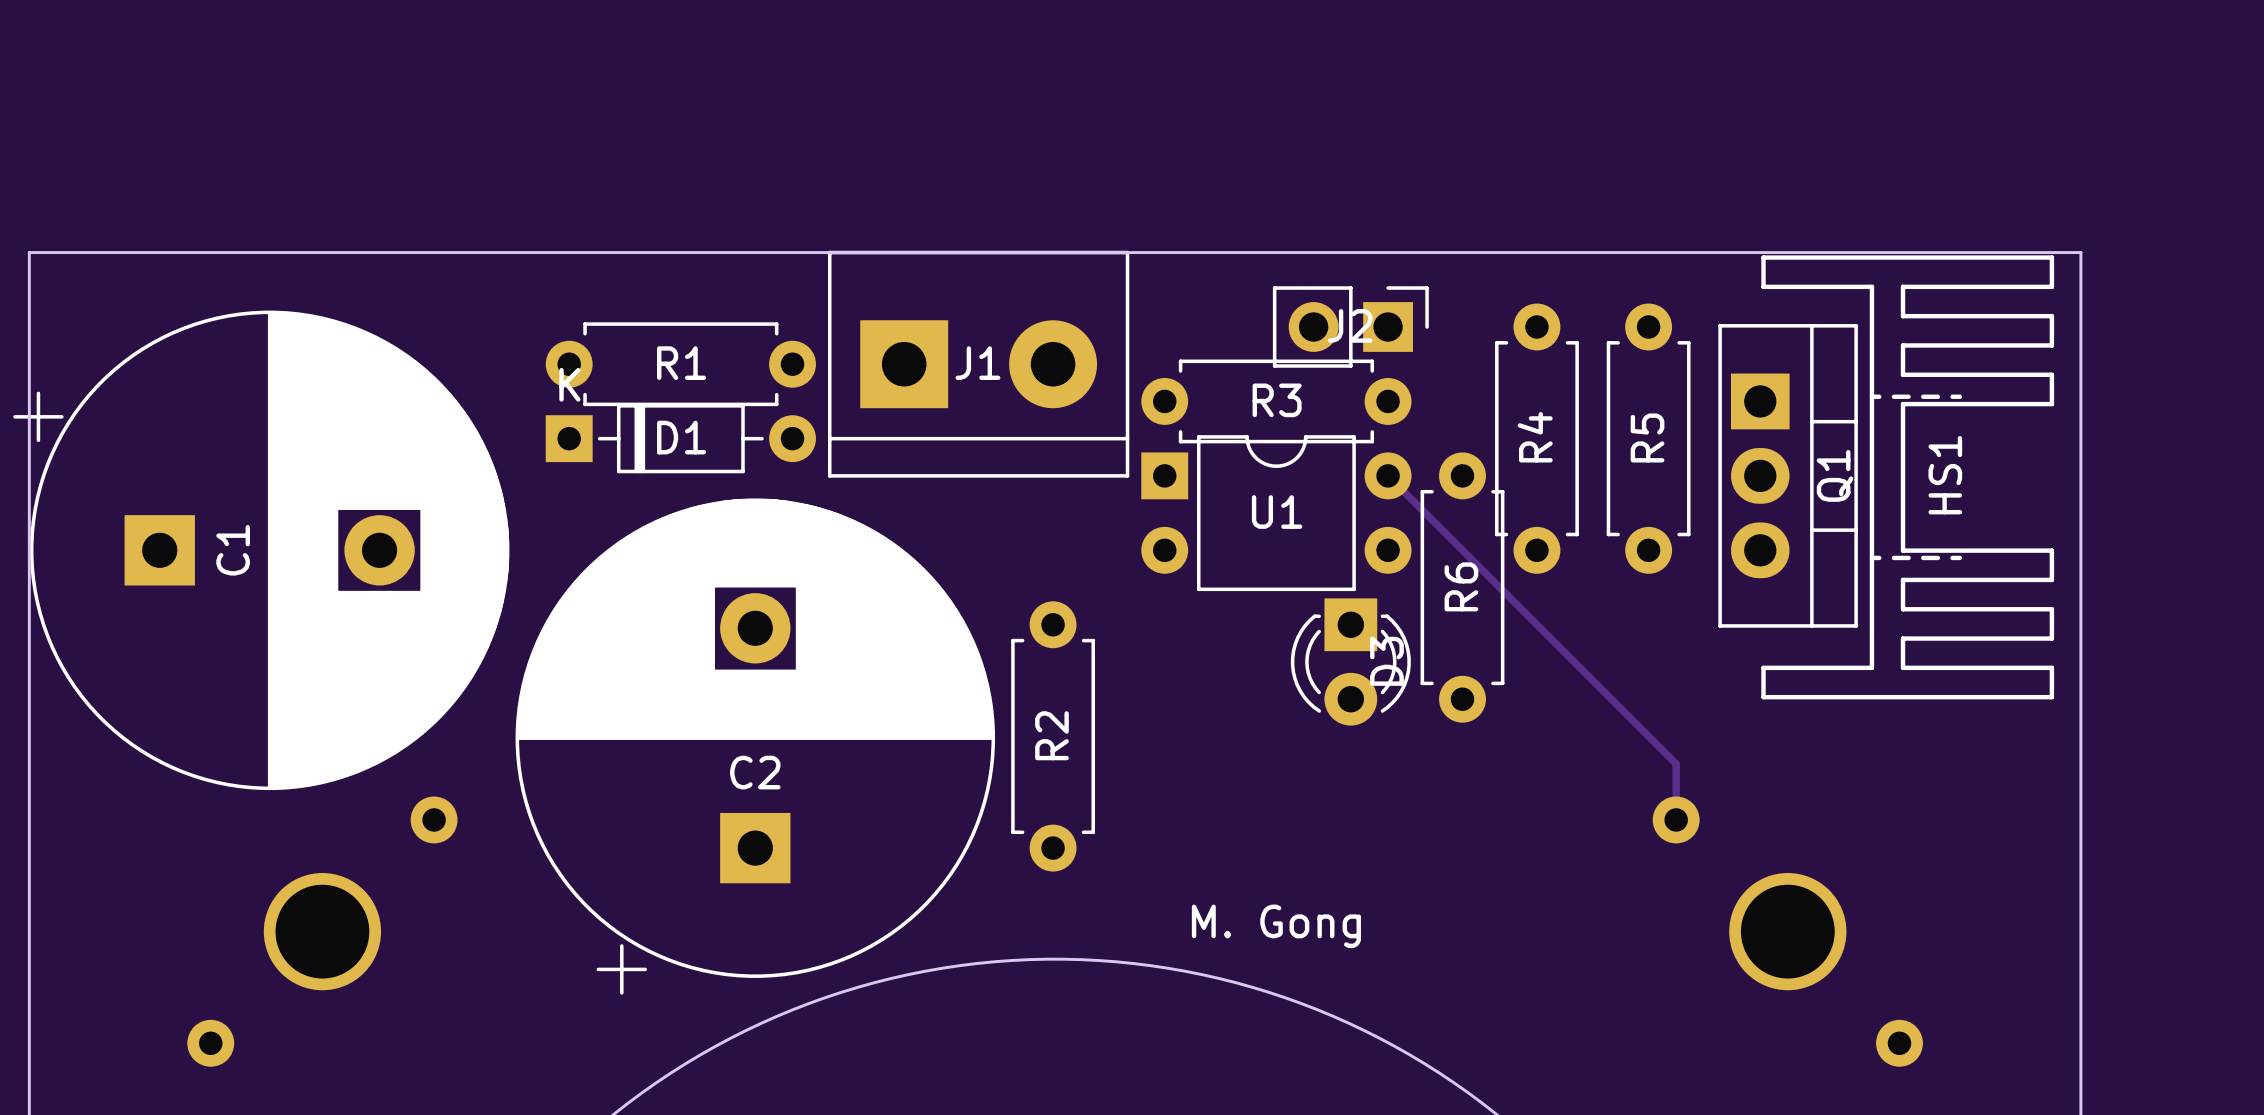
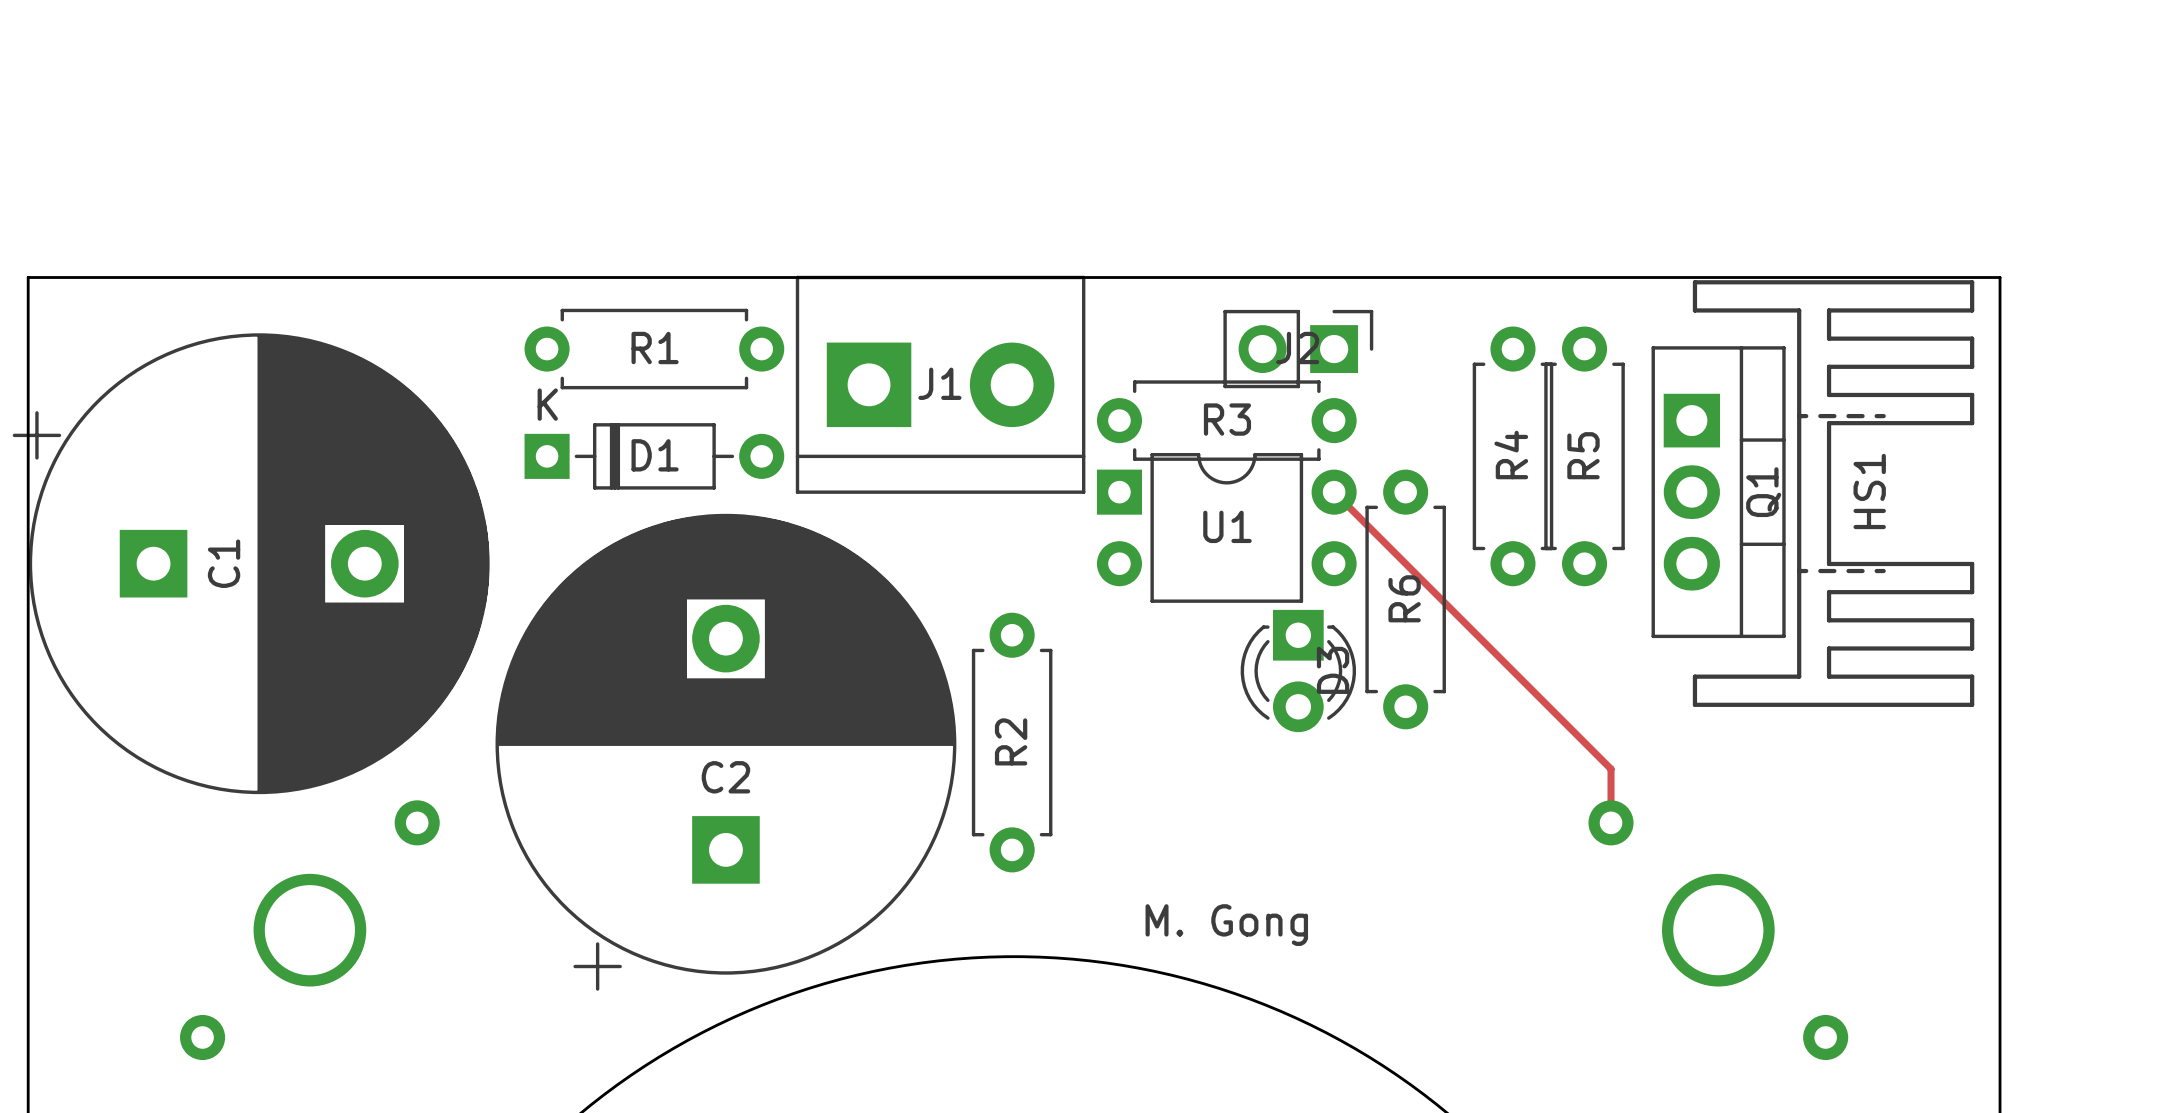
R1 position: (680, 364) -> (654, 349)
R4 position: (1536, 438) -> (1512, 456)

